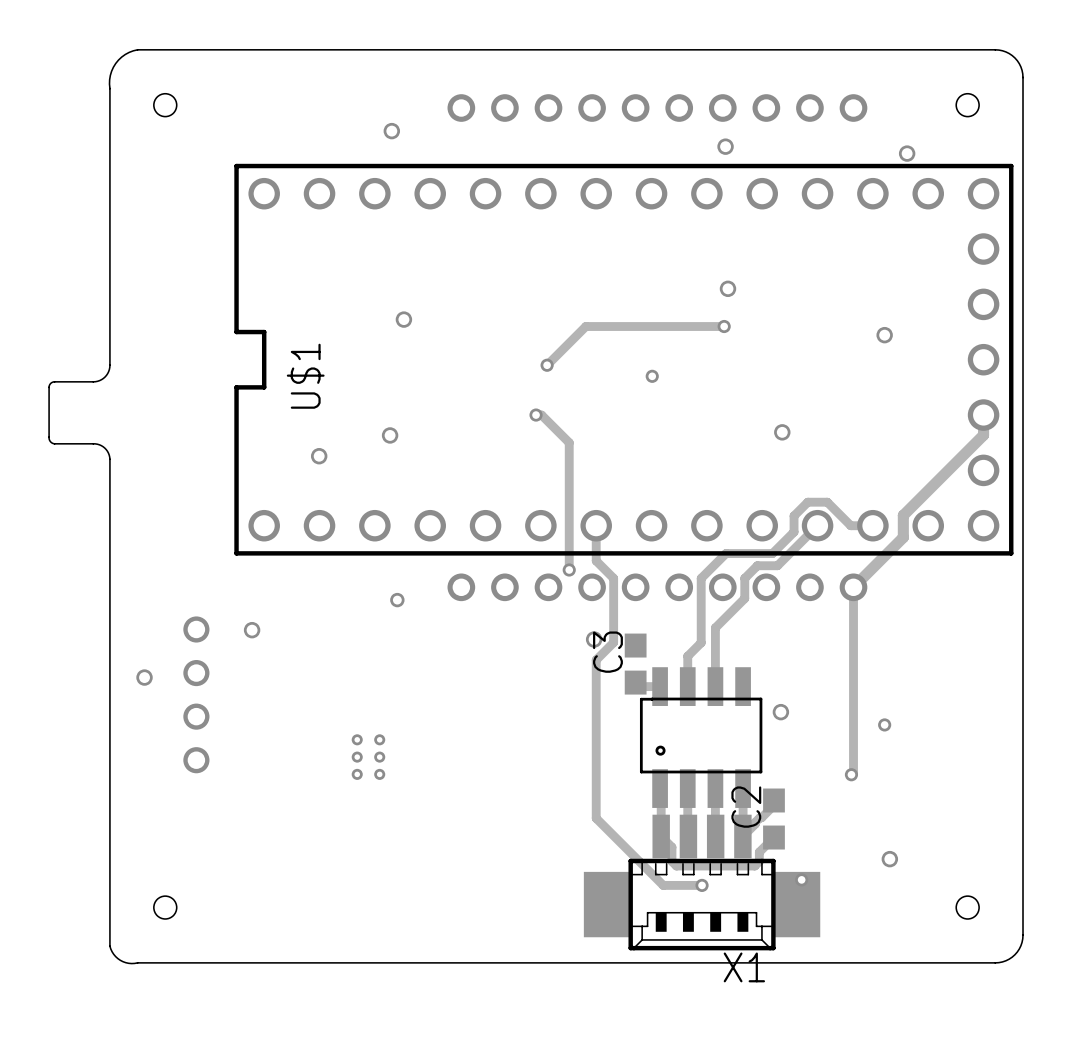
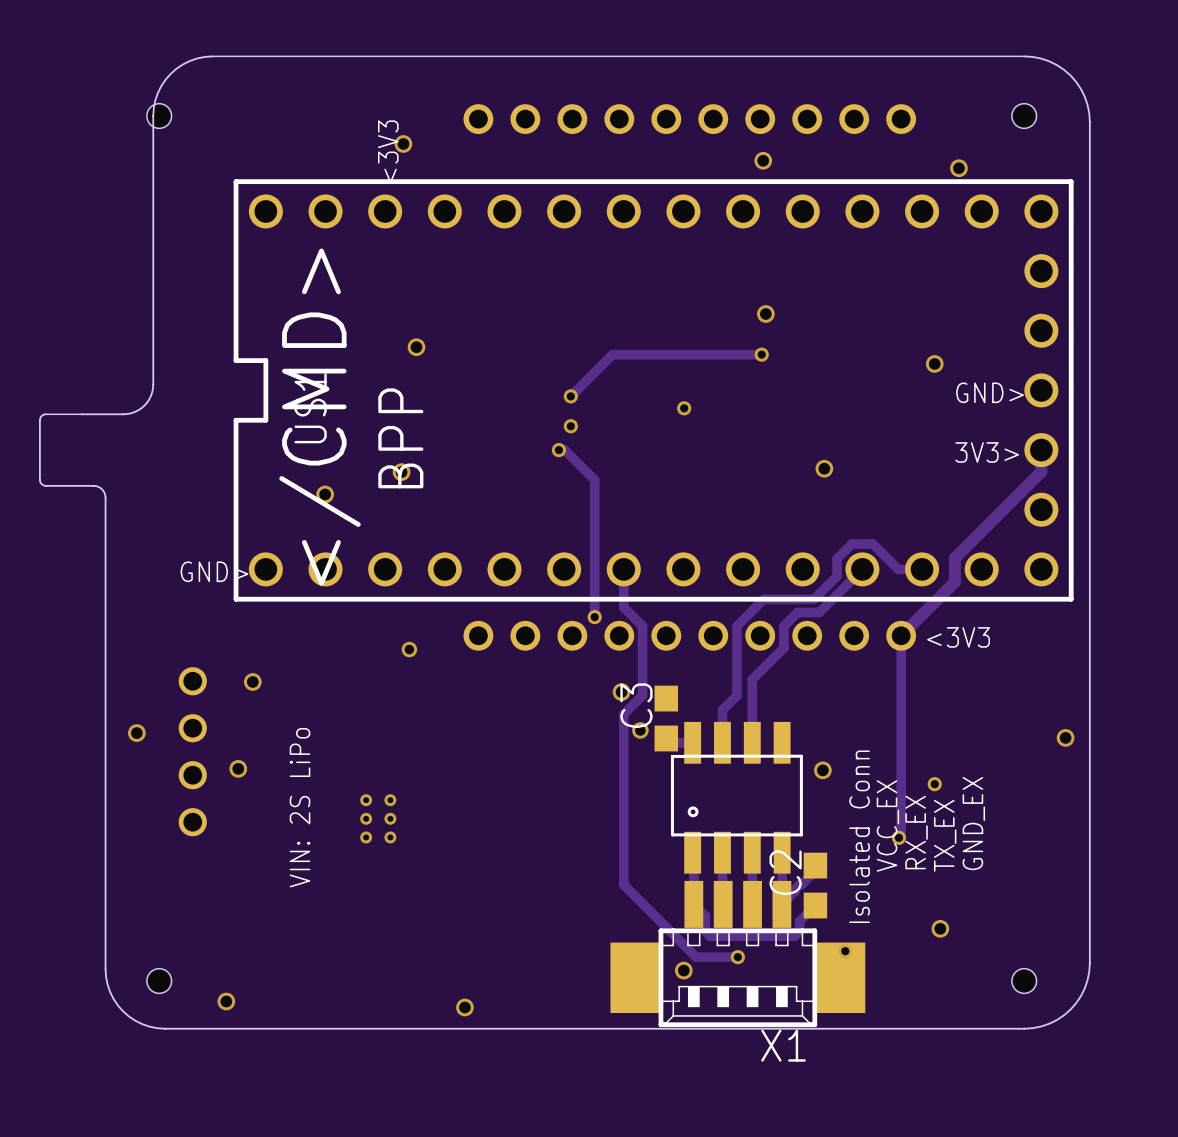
board edge: (215, 49) (137, 49) (121, 57) (111, 71) (109, 84) (109, 365) (105, 376) (93, 381) -> (212, 56) (190, 60) (170, 73) (157, 93) (153, 108) (153, 384) (150, 395) (141, 408) (131, 413) (81, 414)
board edge: (967, 49) (998, 50) (1009, 53) (1019, 63) (1023, 77) (1023, 935) (1019, 949) (1005, 960) (995, 962) (131, 963) (120, 960) (113, 954) (109, 946) (109, 457) (106, 449) (97, 444) (54, 443) (49, 441) (49, 386) (52, 382) (60, 381) -> (1024, 56) (1049, 61) (1070, 75) (1084, 96) (1089, 121) (1089, 963) (1087, 980) (1081, 995) (1070, 1009) (1049, 1023) (1024, 1028) (165, 1028) (149, 1026) (135, 1020) (123, 1011) (113, 998) (107, 984) (105, 969) (105, 496) (102, 489) (95, 485) (45, 485) (41, 483) (39, 419) (45, 414)
text: none -> <3V3 (388, 151)
text: none -> GND> (990, 392)
text: none -> </CMD> (320, 417)
via: none -> (570, 426)
text: none -> BPP (400, 438)
text: none -> 3V3> (987, 452)
text: none -> GND> (214, 571)
text: none -> <3V3 (958, 637)
via: none -> (640, 730)
via: none -> (1065, 737)
via: none -> (238, 768)
text: none -> VIN: 2S LiPo (300, 807)
text: none -> GND_EX (973, 823)
text: none -> VCC_EX (887, 825)
text: none -> RX_EX (916, 832)
text: none -> TX_EX (945, 835)
text: none -> Isolated Conn (859, 836)
via: none -> (683, 970)
via: none -> (226, 1001)
via: none -> (464, 1007)

